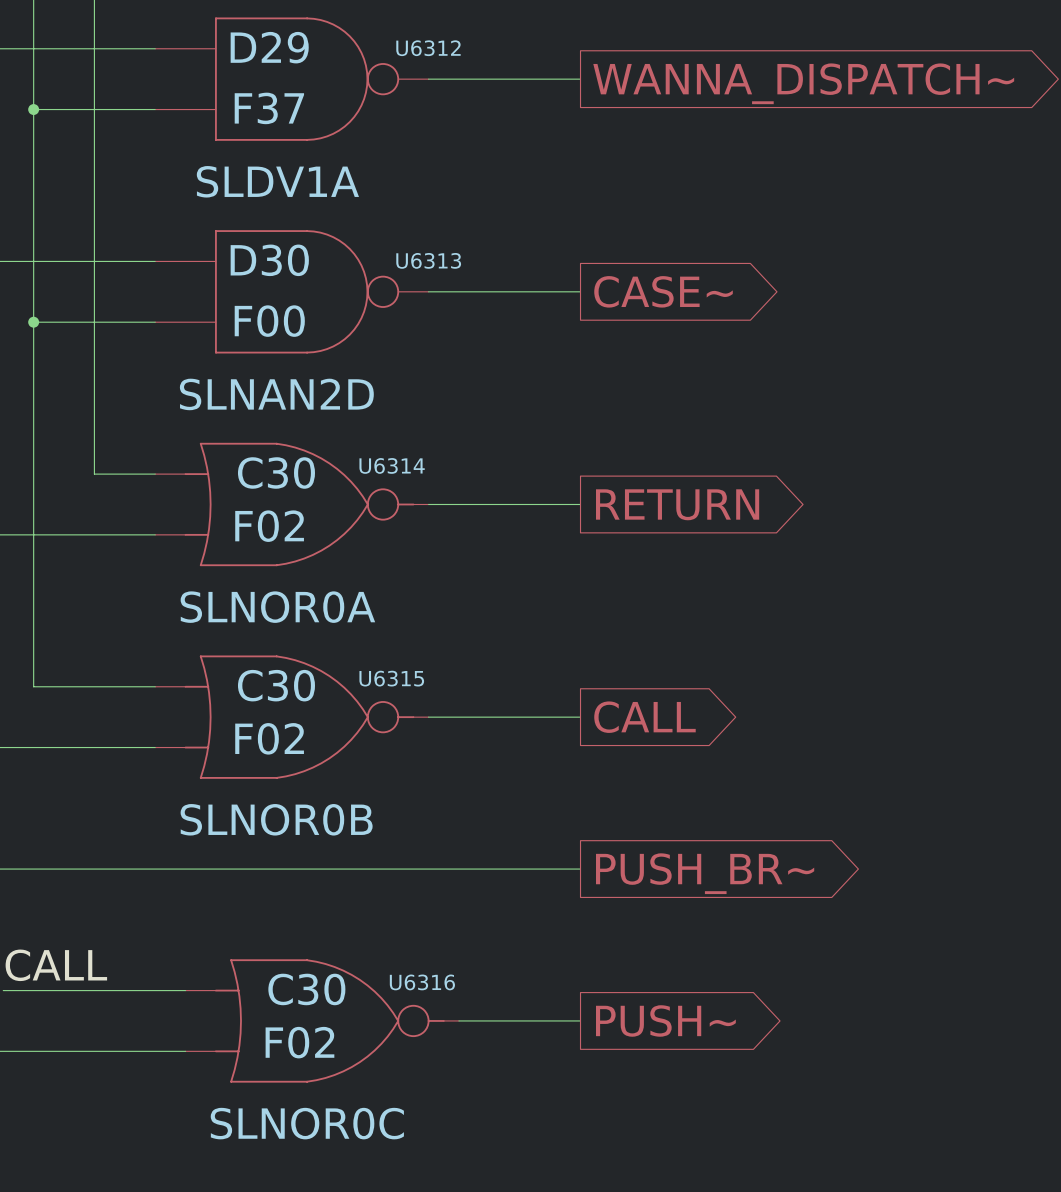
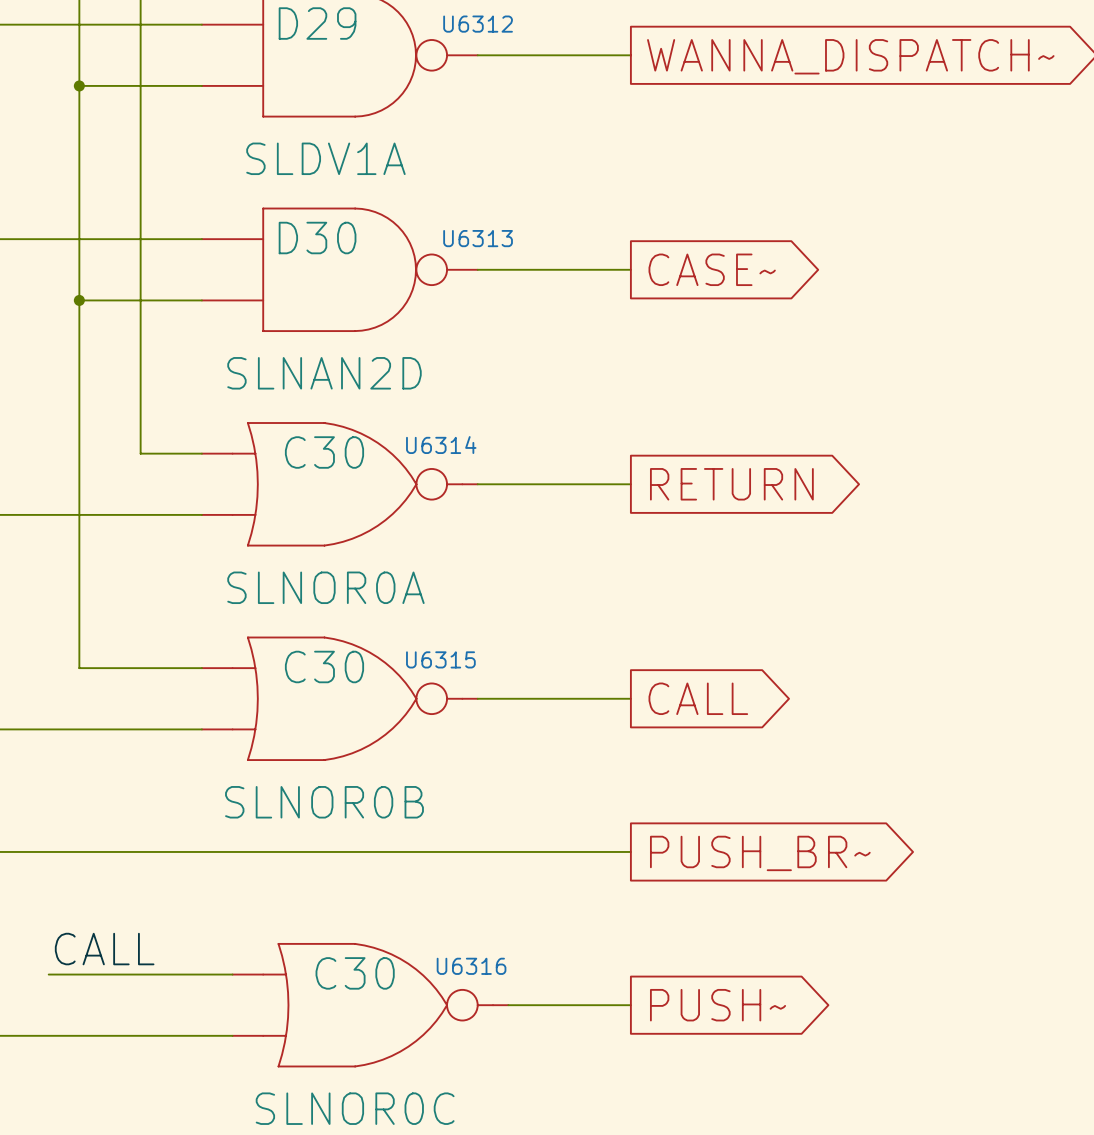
U6312 value: F37 (269, 108) -> none
U6313 value: F00 (269, 321) -> none
U6314 value: F02 (269, 526) -> none
U6315 value: F02 (269, 738) -> none
U6316 value: F02 (299, 1042) -> none

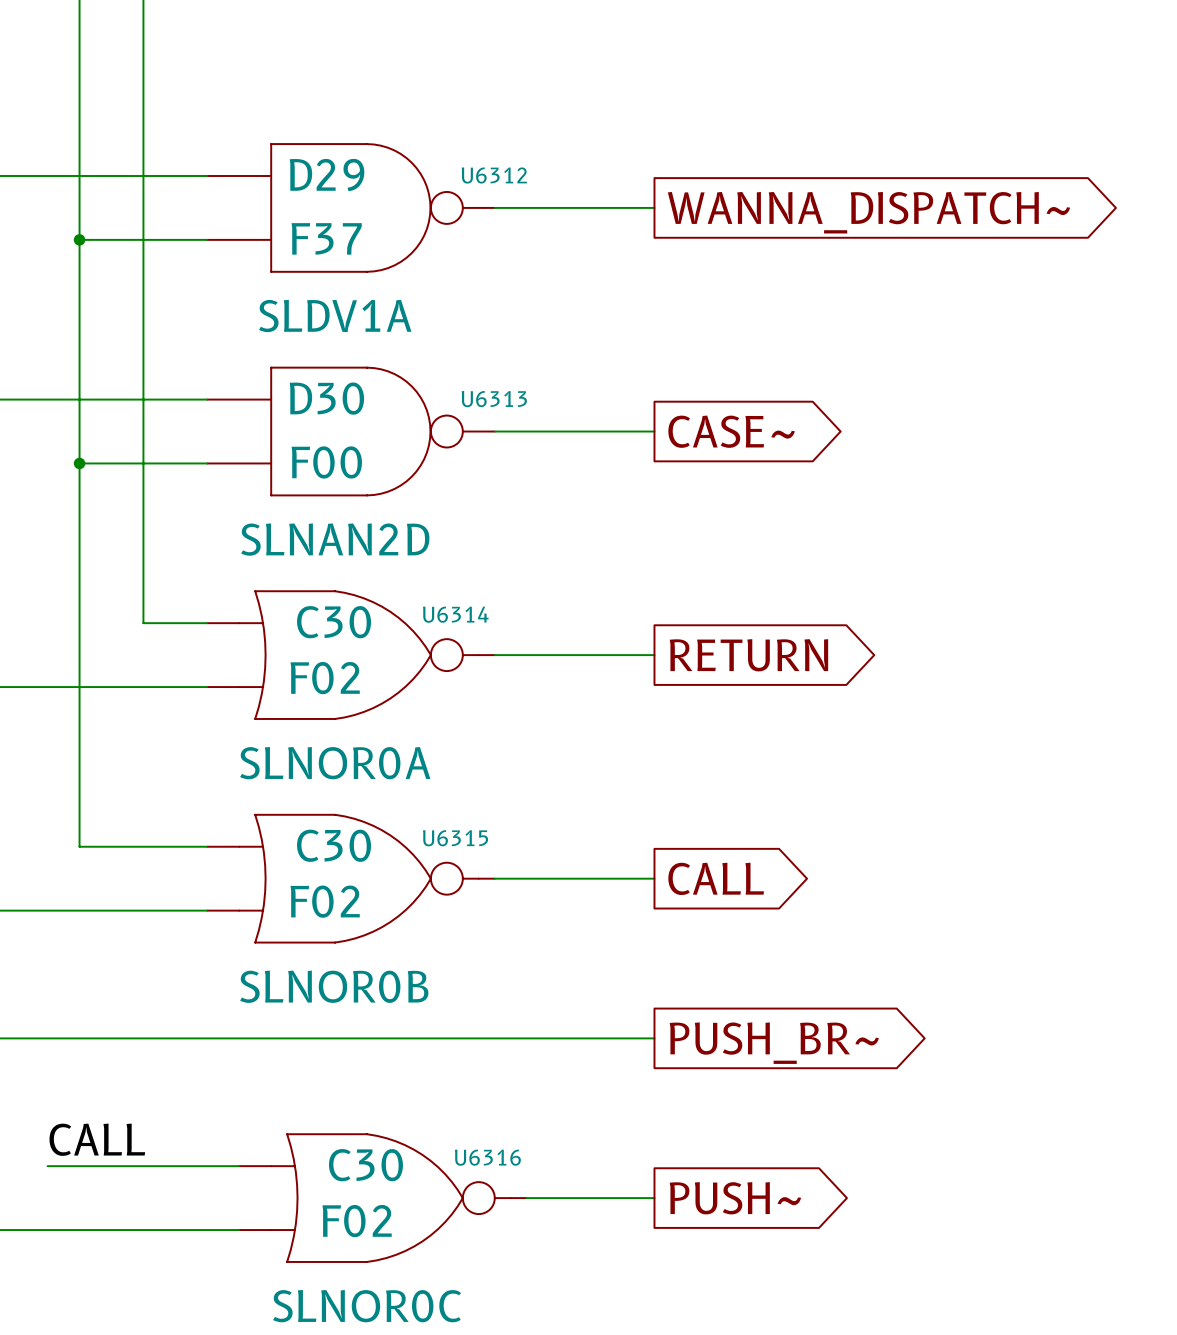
U6312 value: none -> F37 (326, 238)
U6313 value: none -> F00 (326, 462)
U6314 value: none -> F02 (325, 678)
U6315 value: none -> F02 (325, 901)
U6316 value: none -> F02 (357, 1221)

